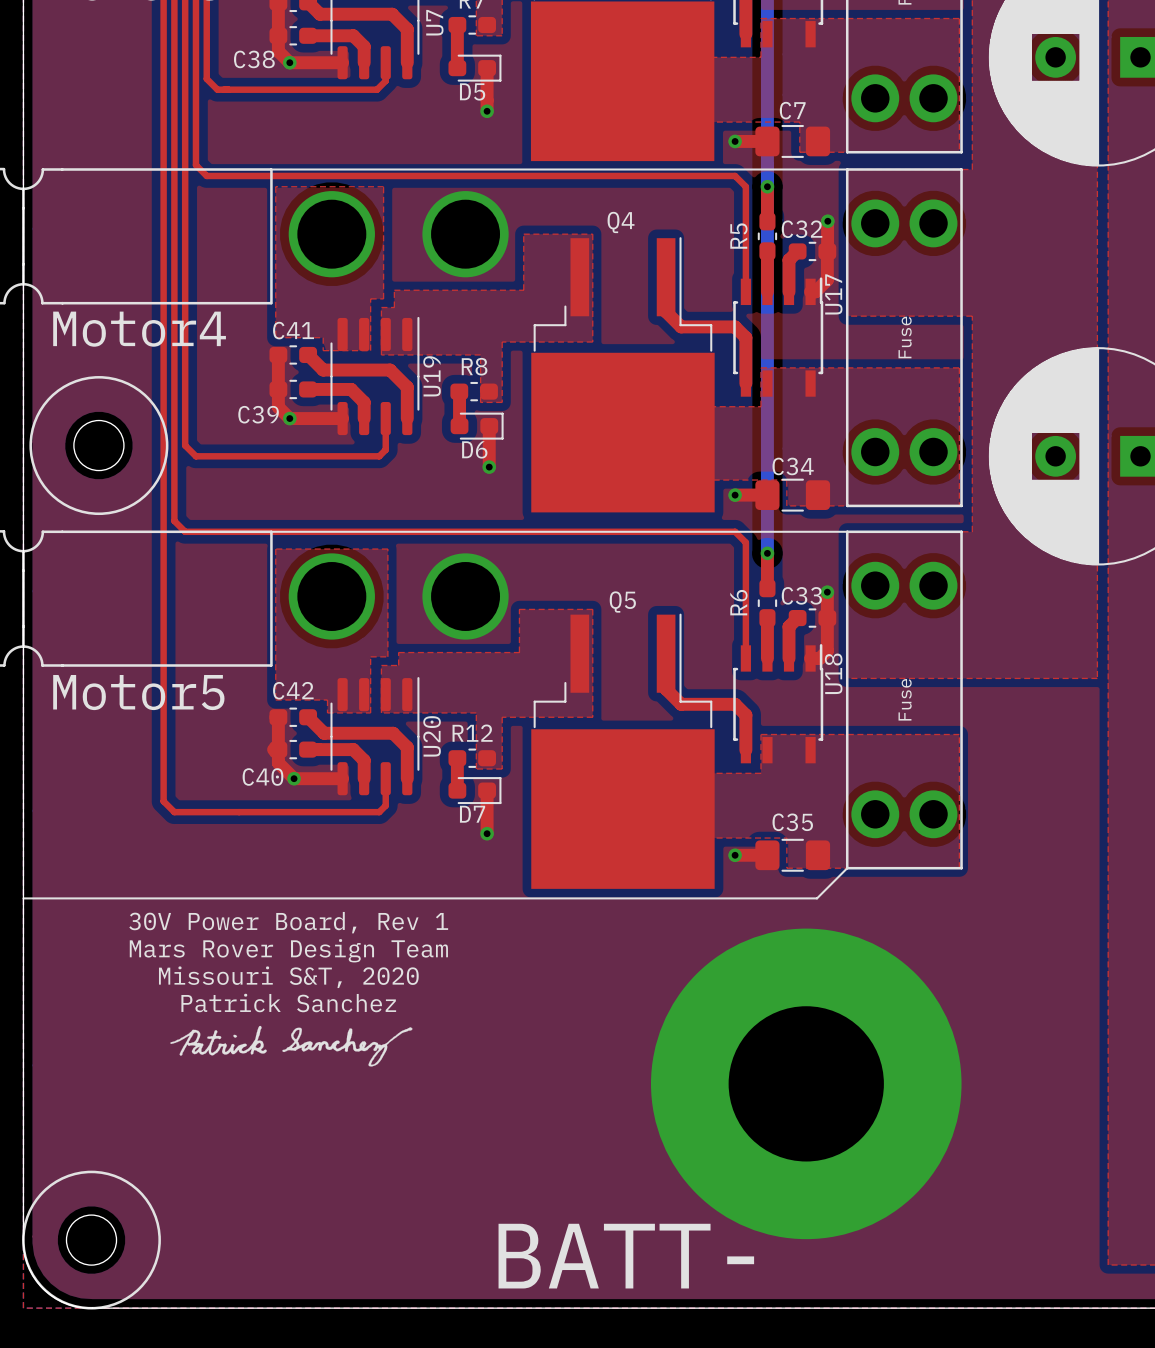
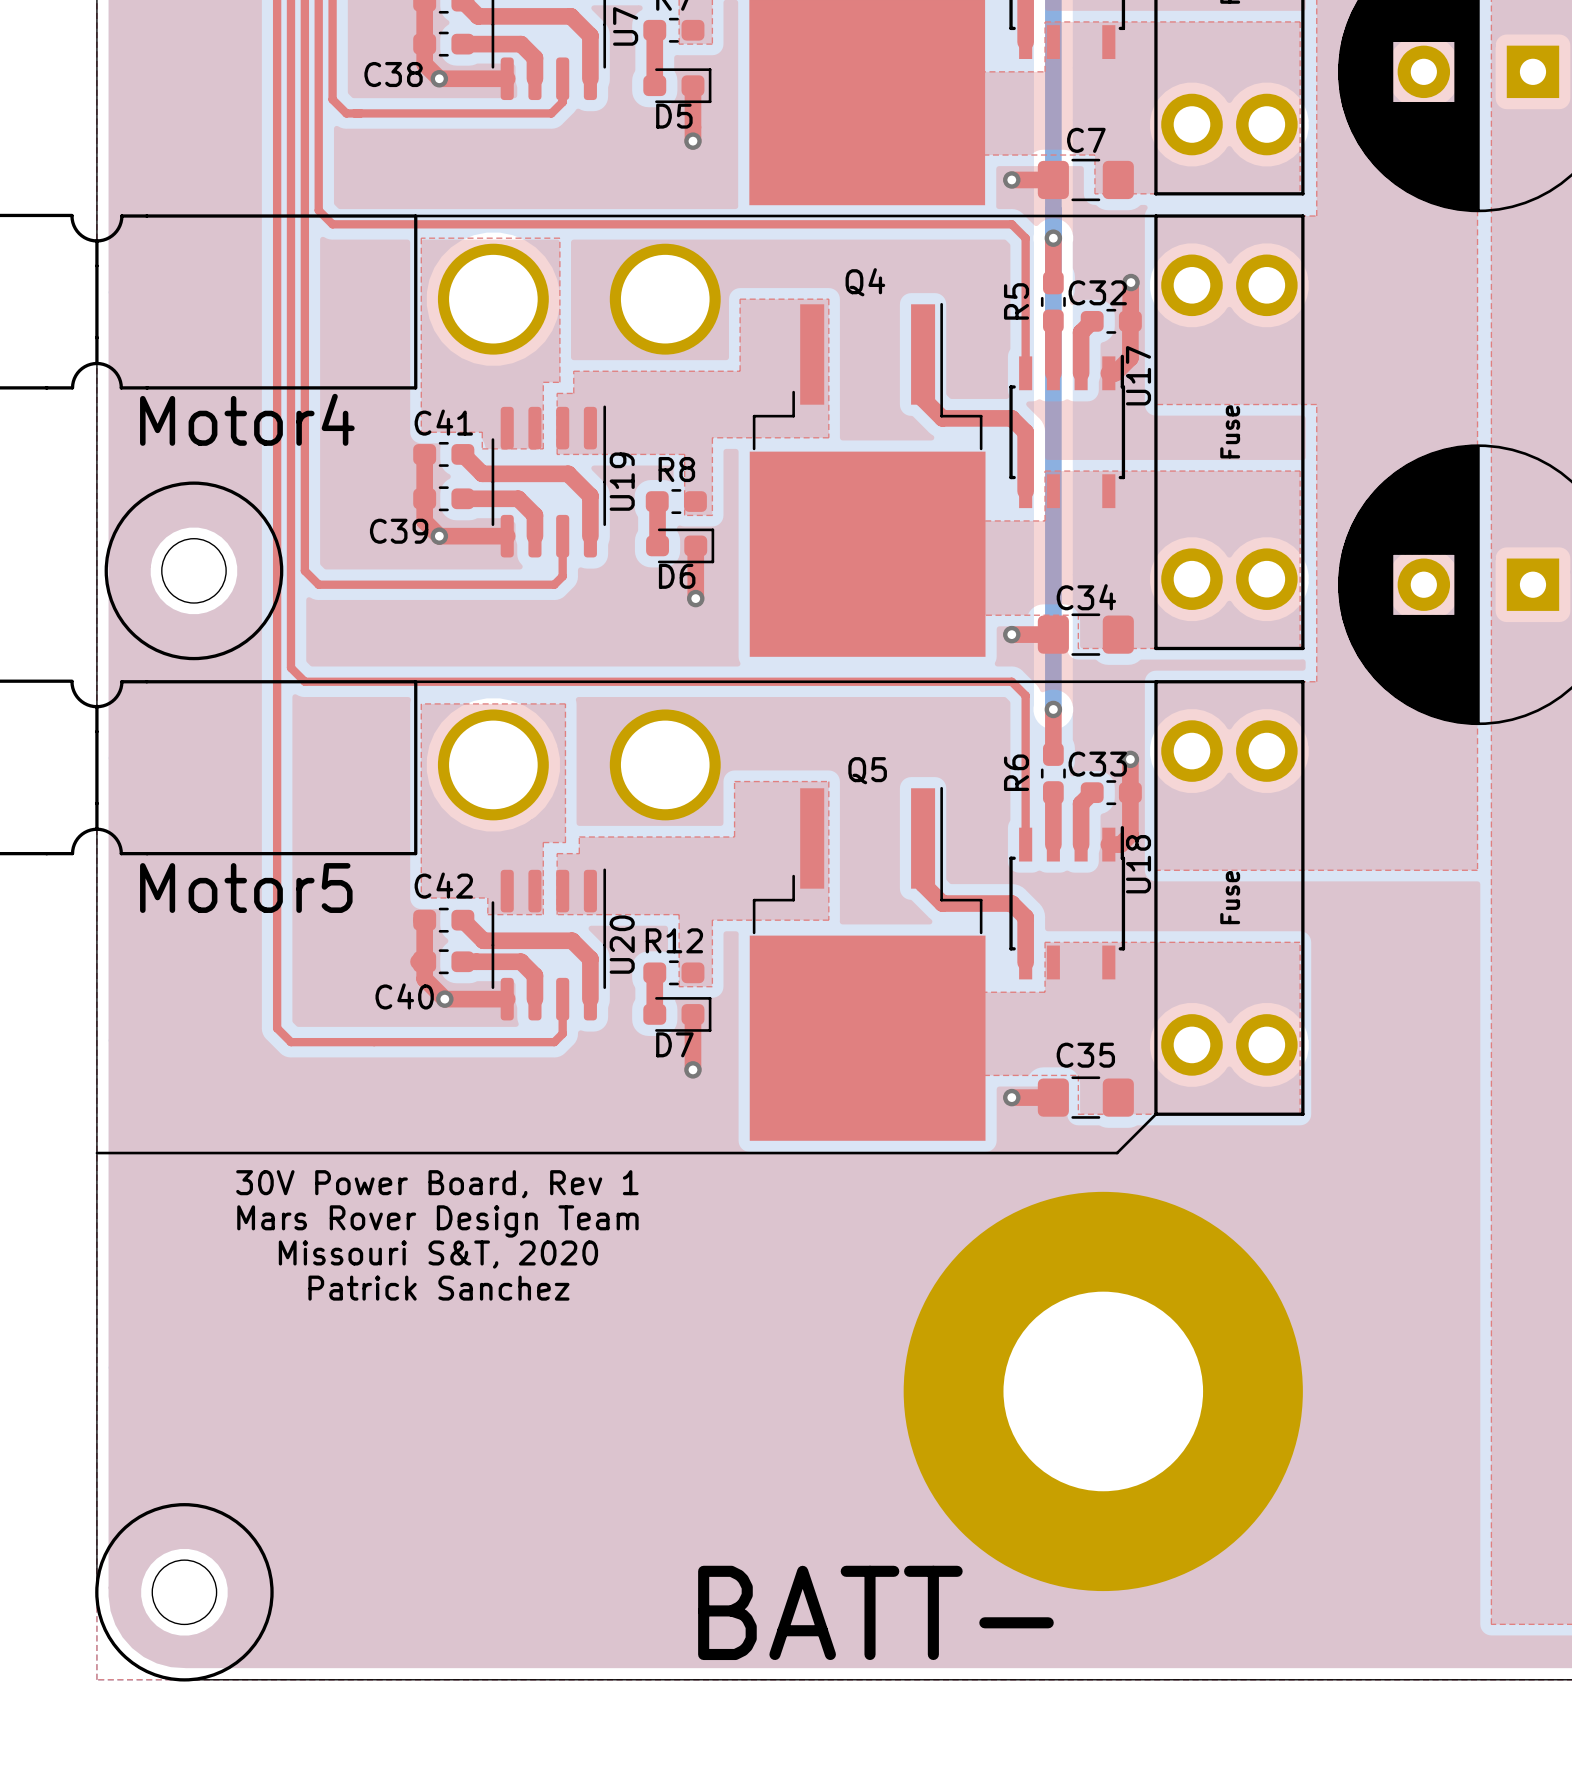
drawing: [170, 1025, 413, 1067] -> none

